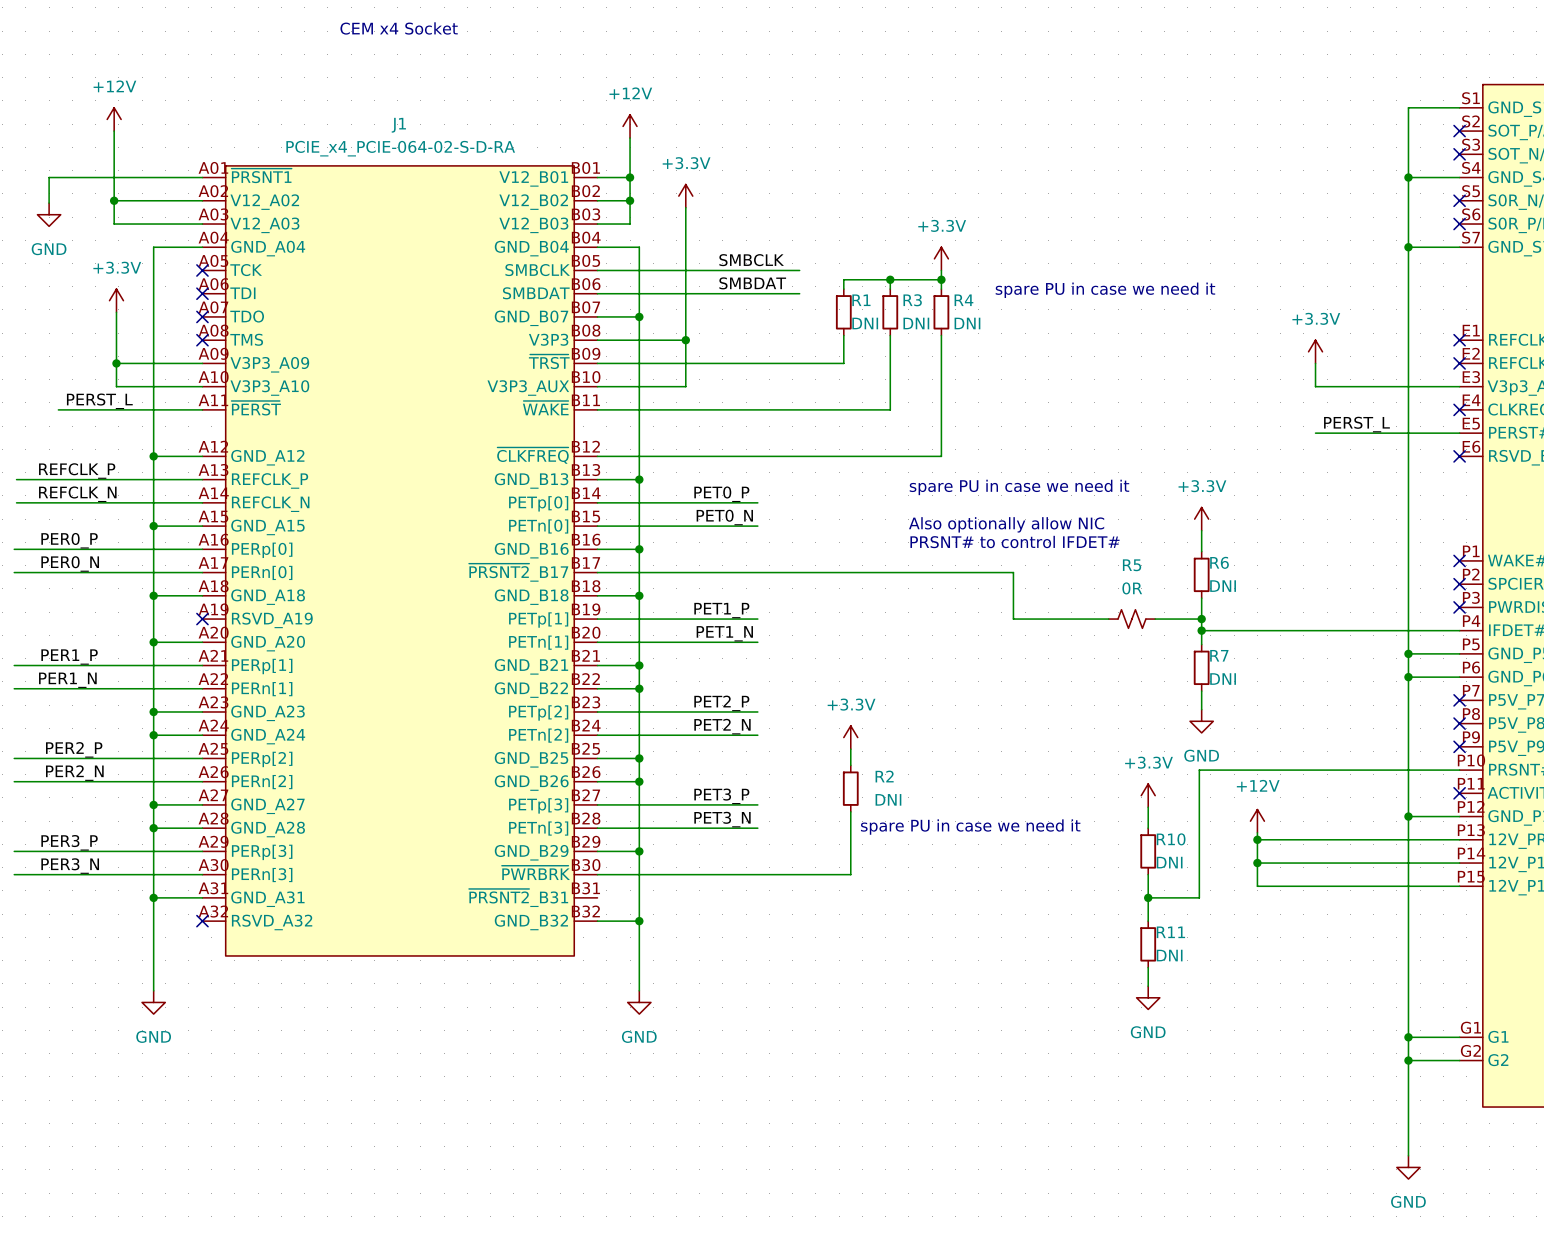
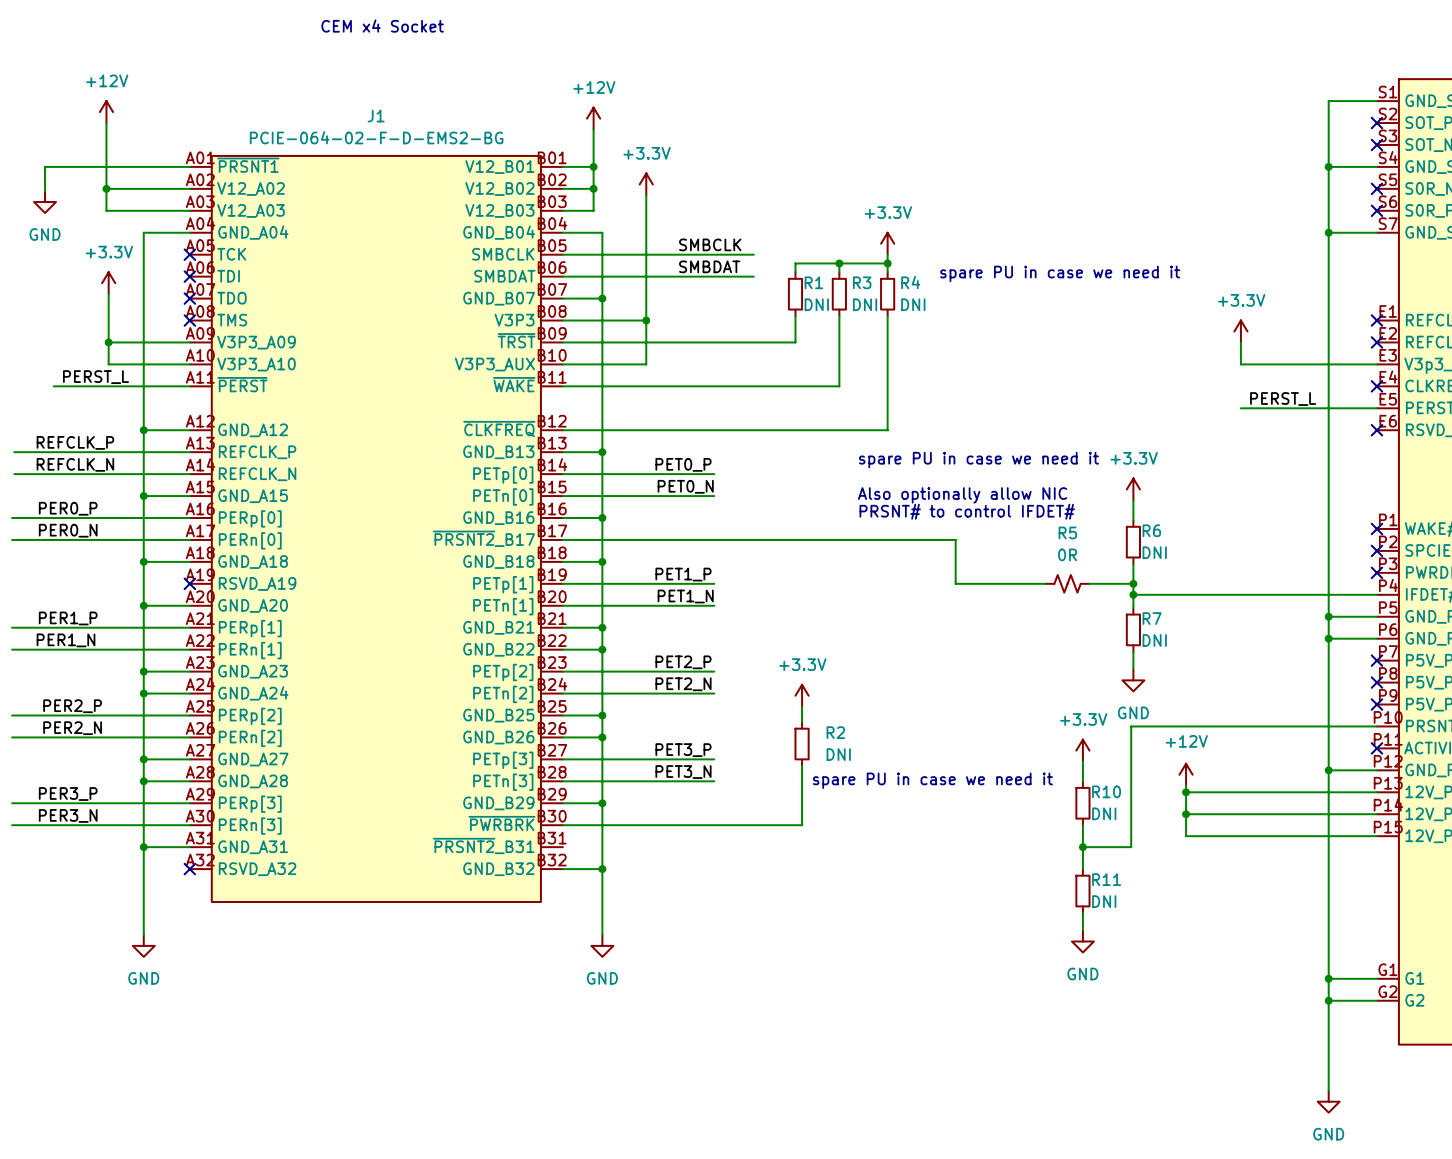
J1 value: PCIE_x4_PCIE-064-02-S-D-RA (400, 148) -> PCIE-064-02-F-D-EMS2-BG (376, 137)

